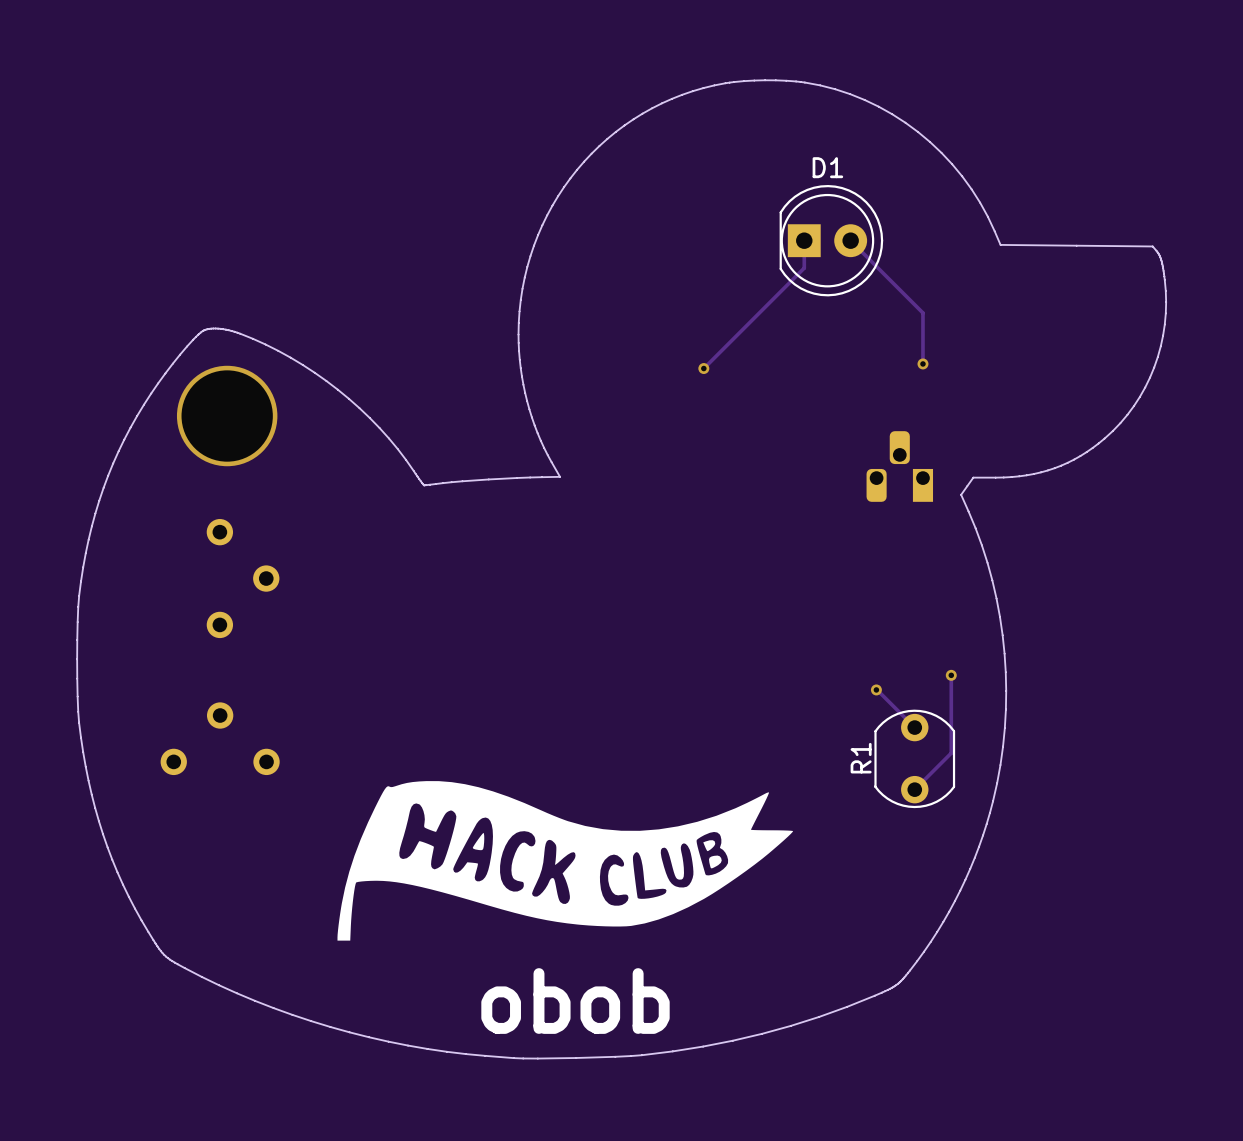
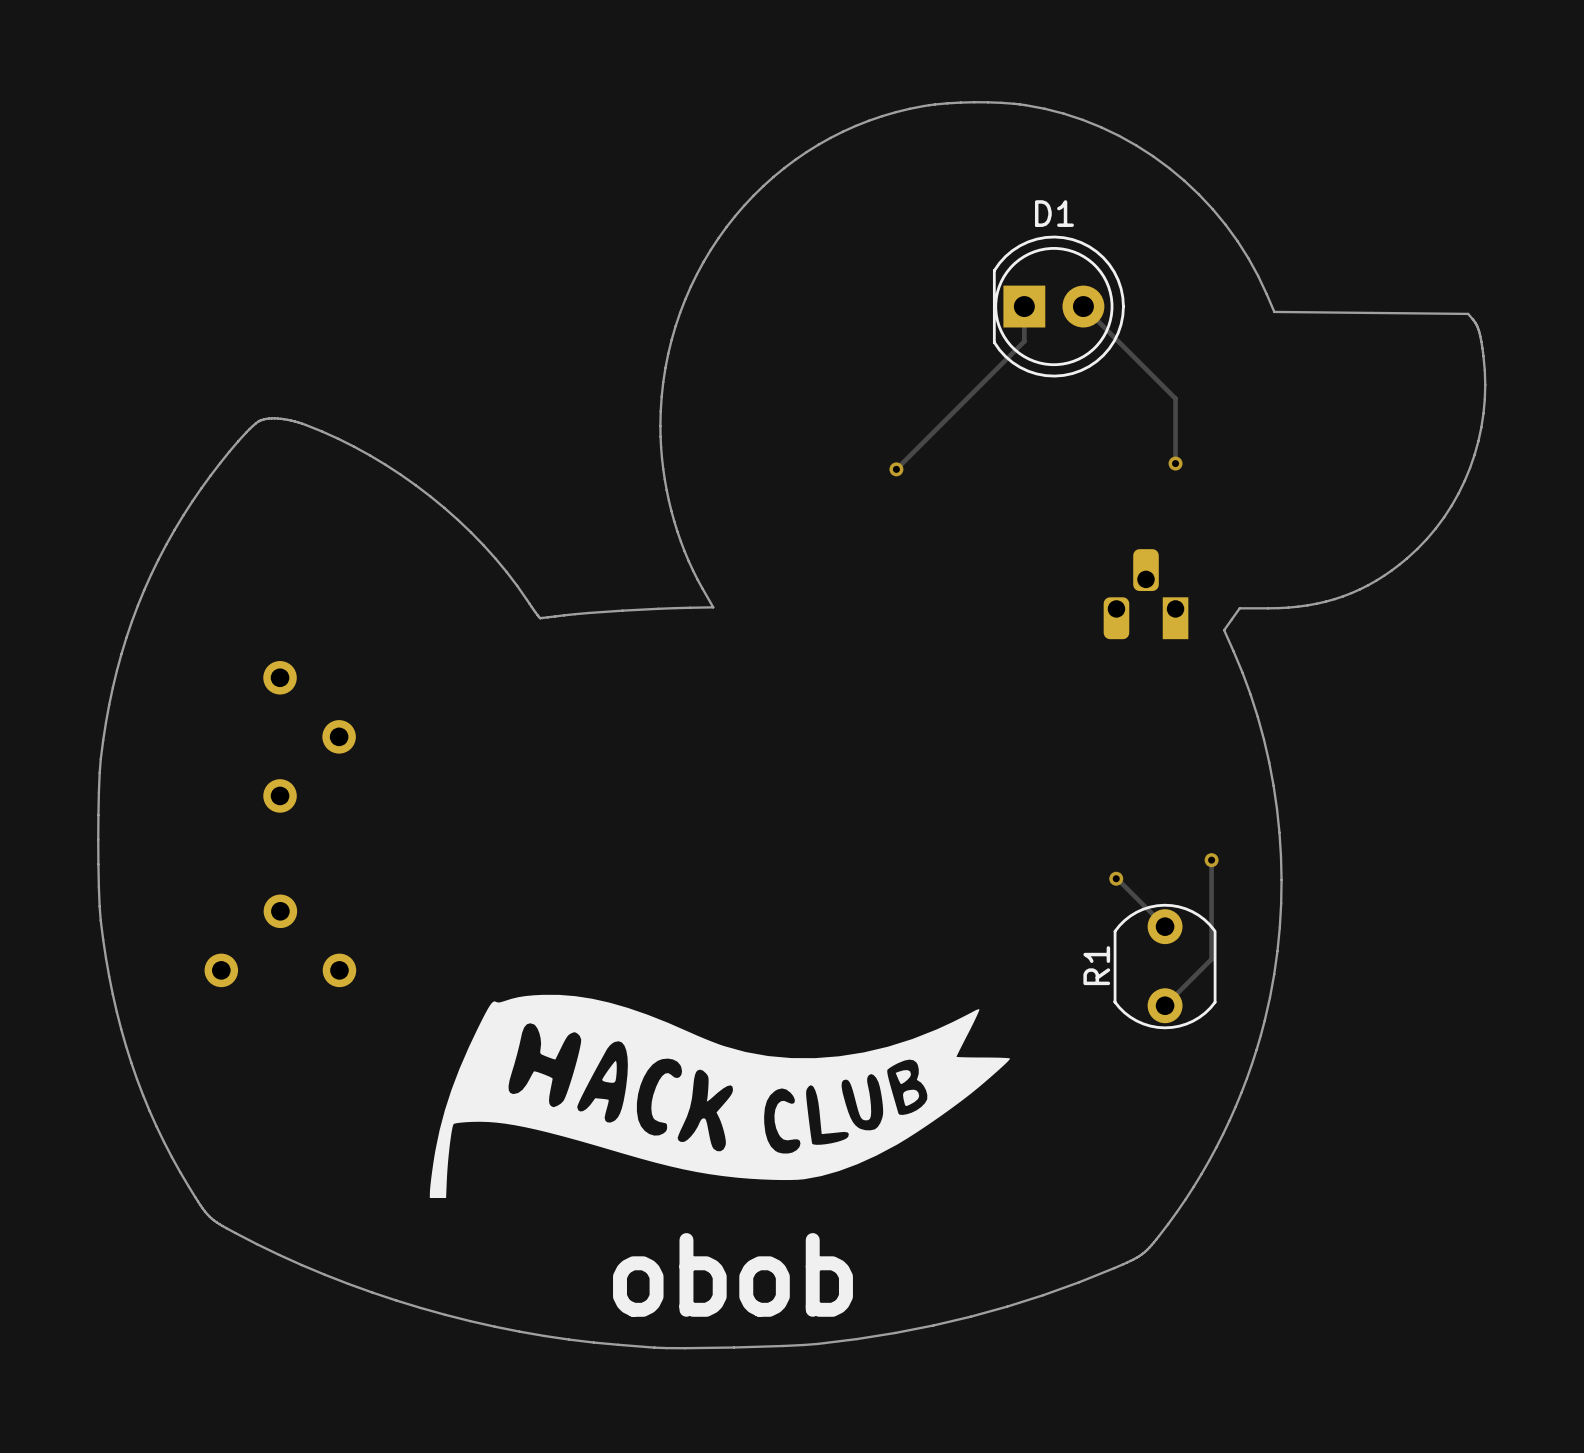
via: (227, 416) -> none

